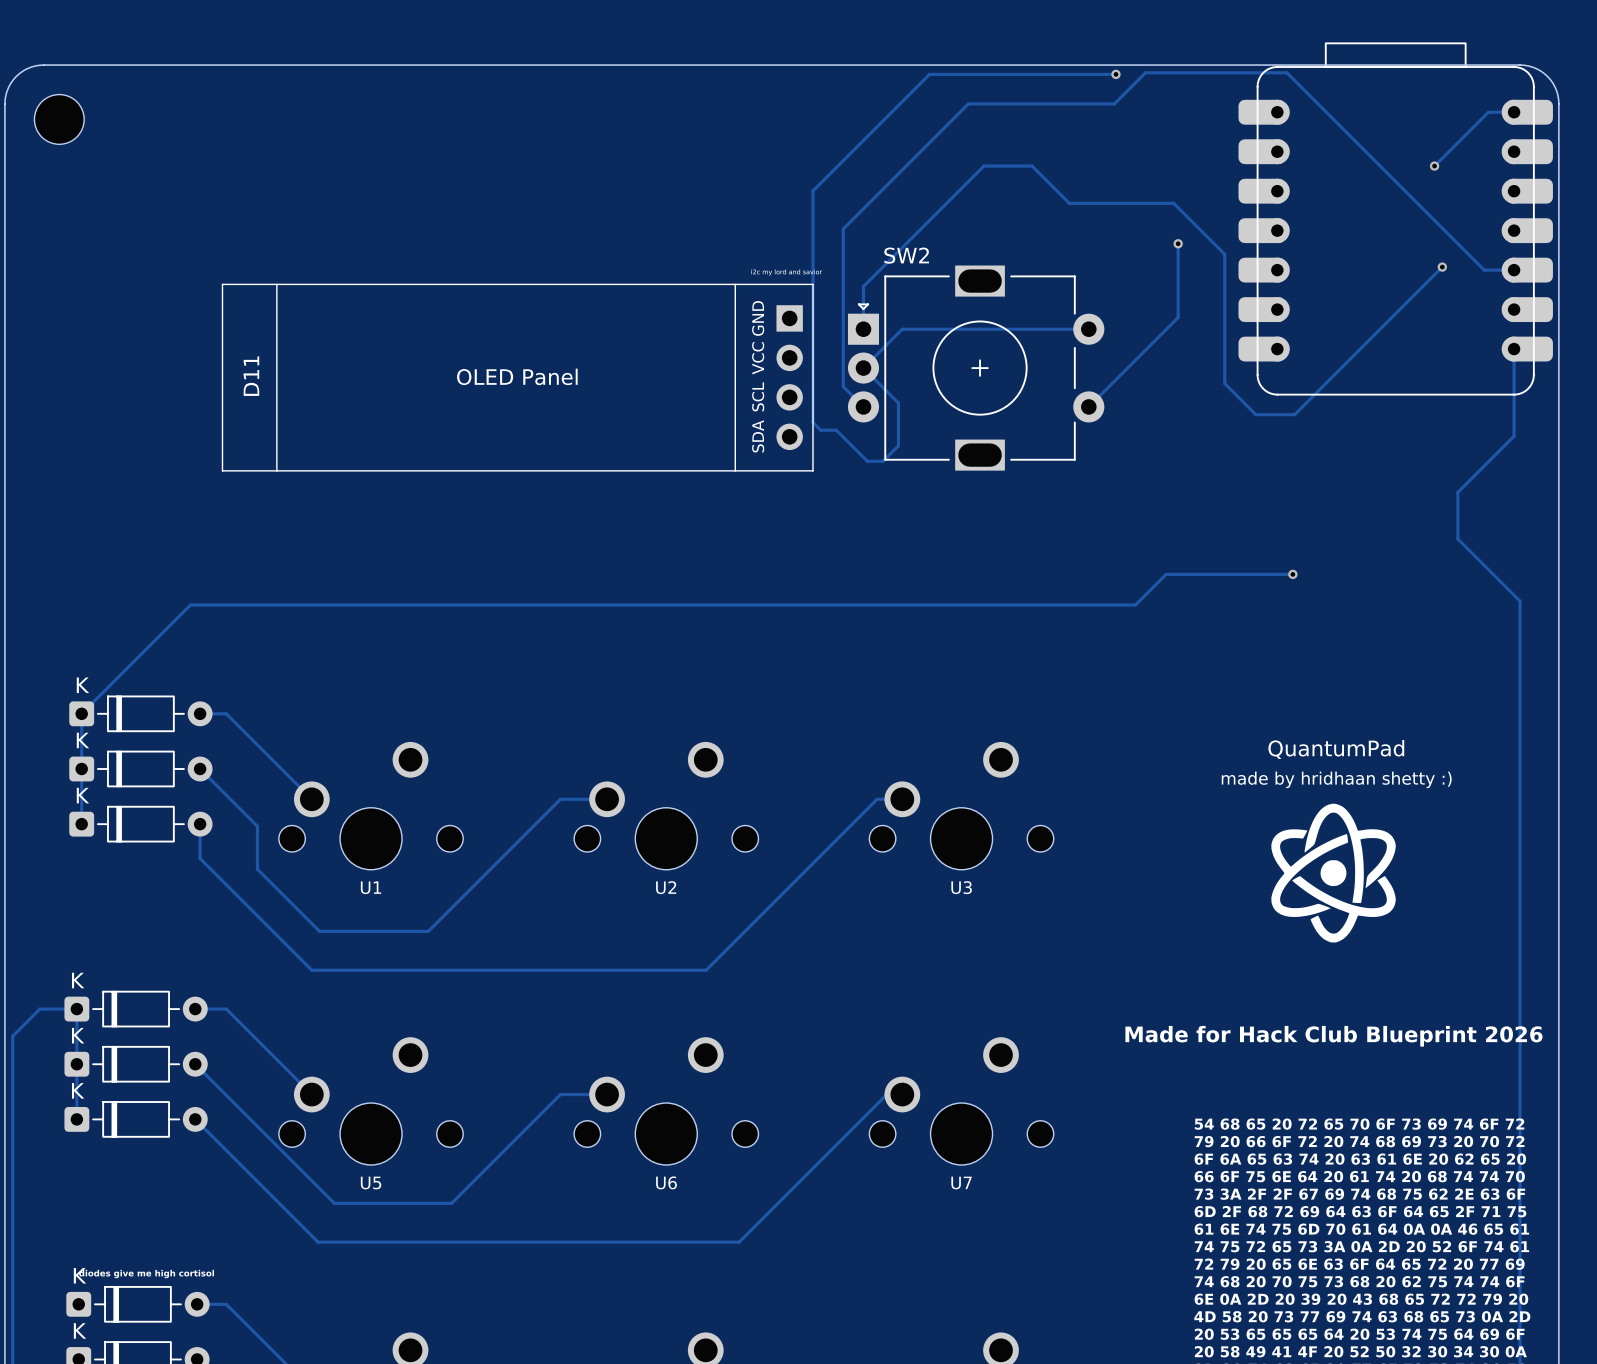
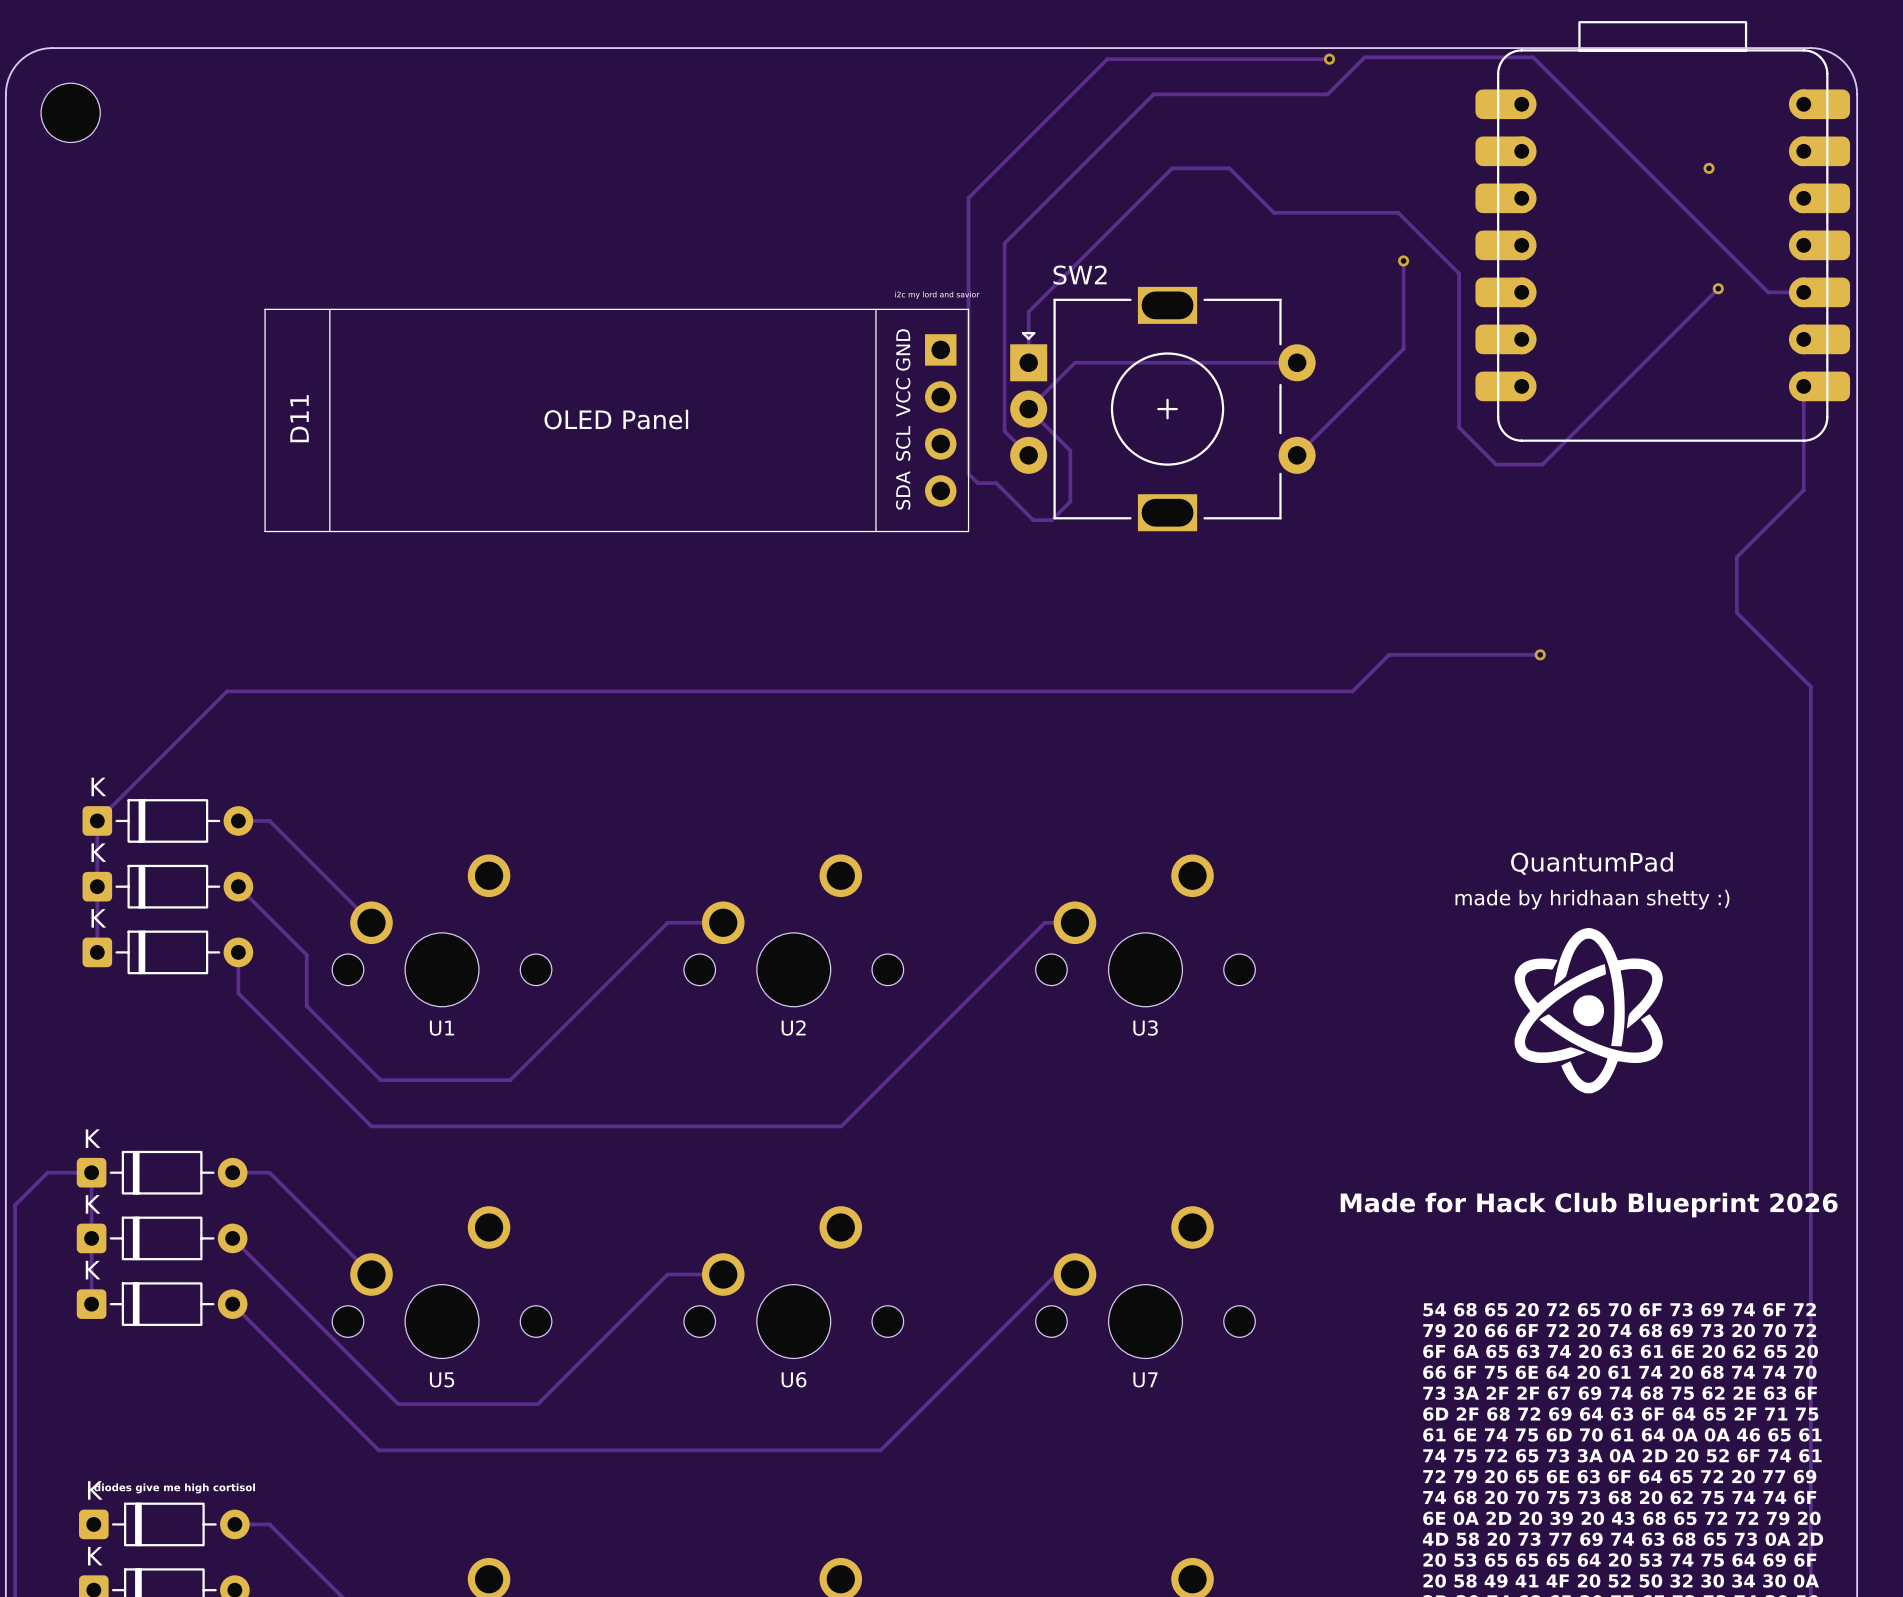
track: (1514, 112) (1488, 112) (1434, 166) -> none

